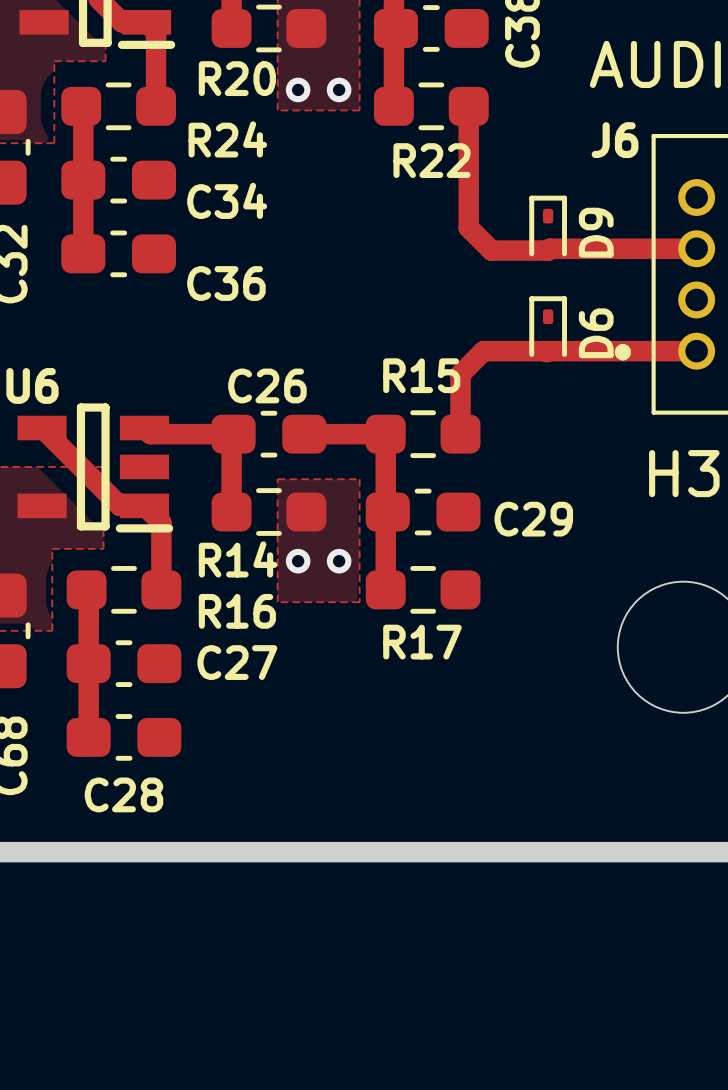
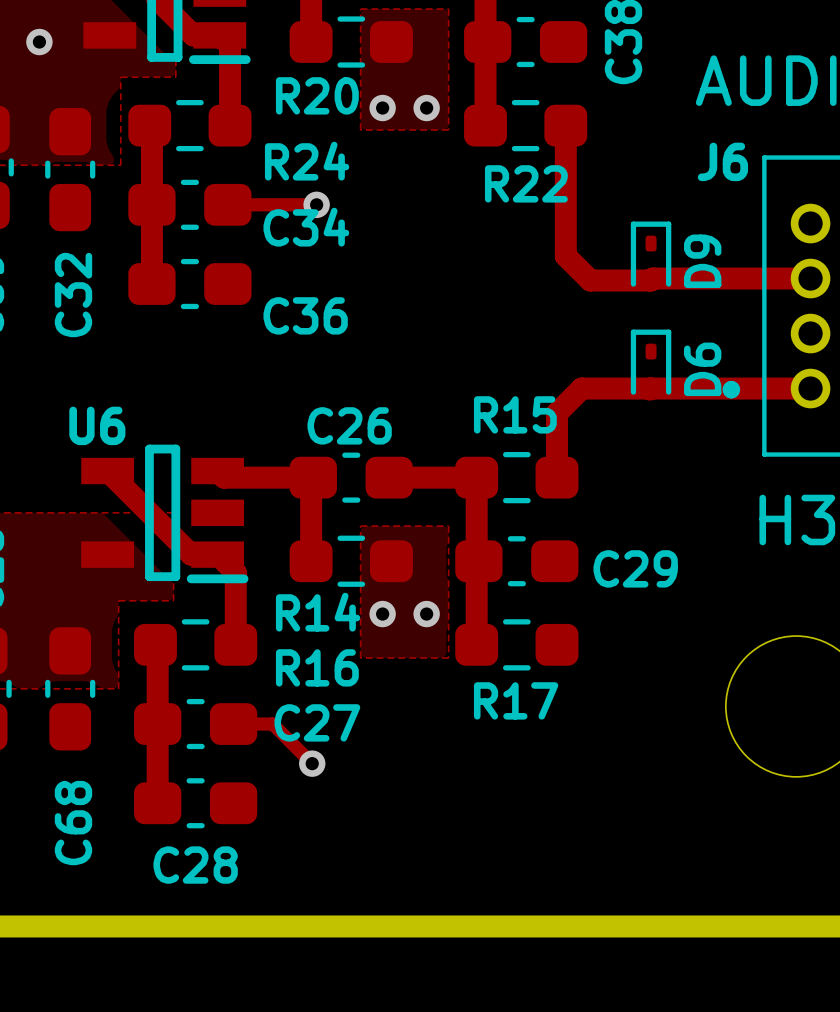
track: none -> (227, 204) (316, 204)
via: none -> (316, 204)
track: none -> (233, 724) (272, 724) (312, 763)
via: none -> (312, 763)

